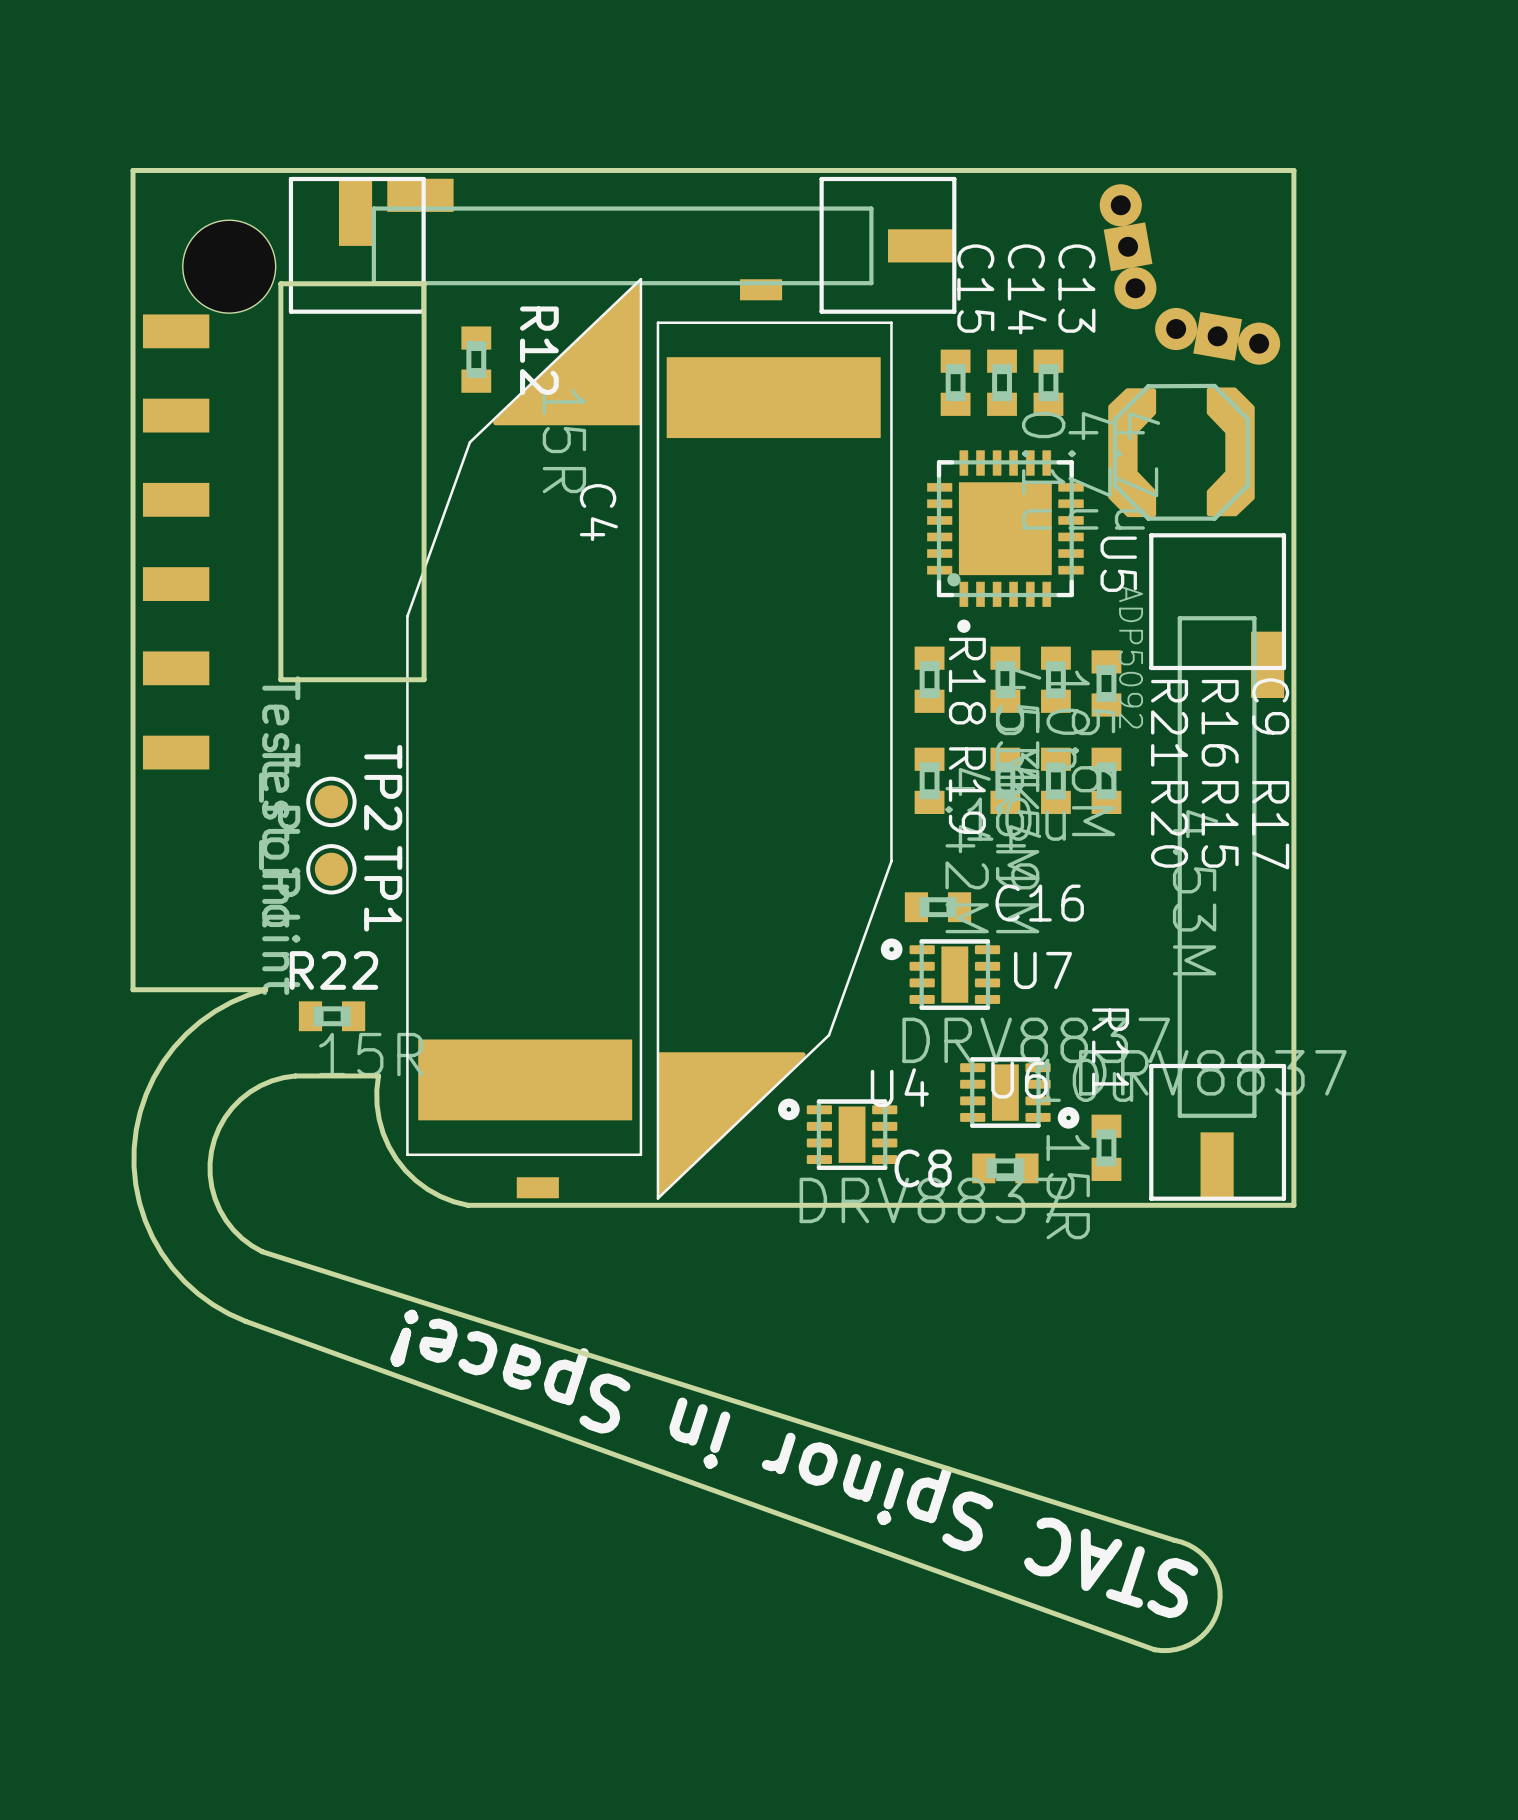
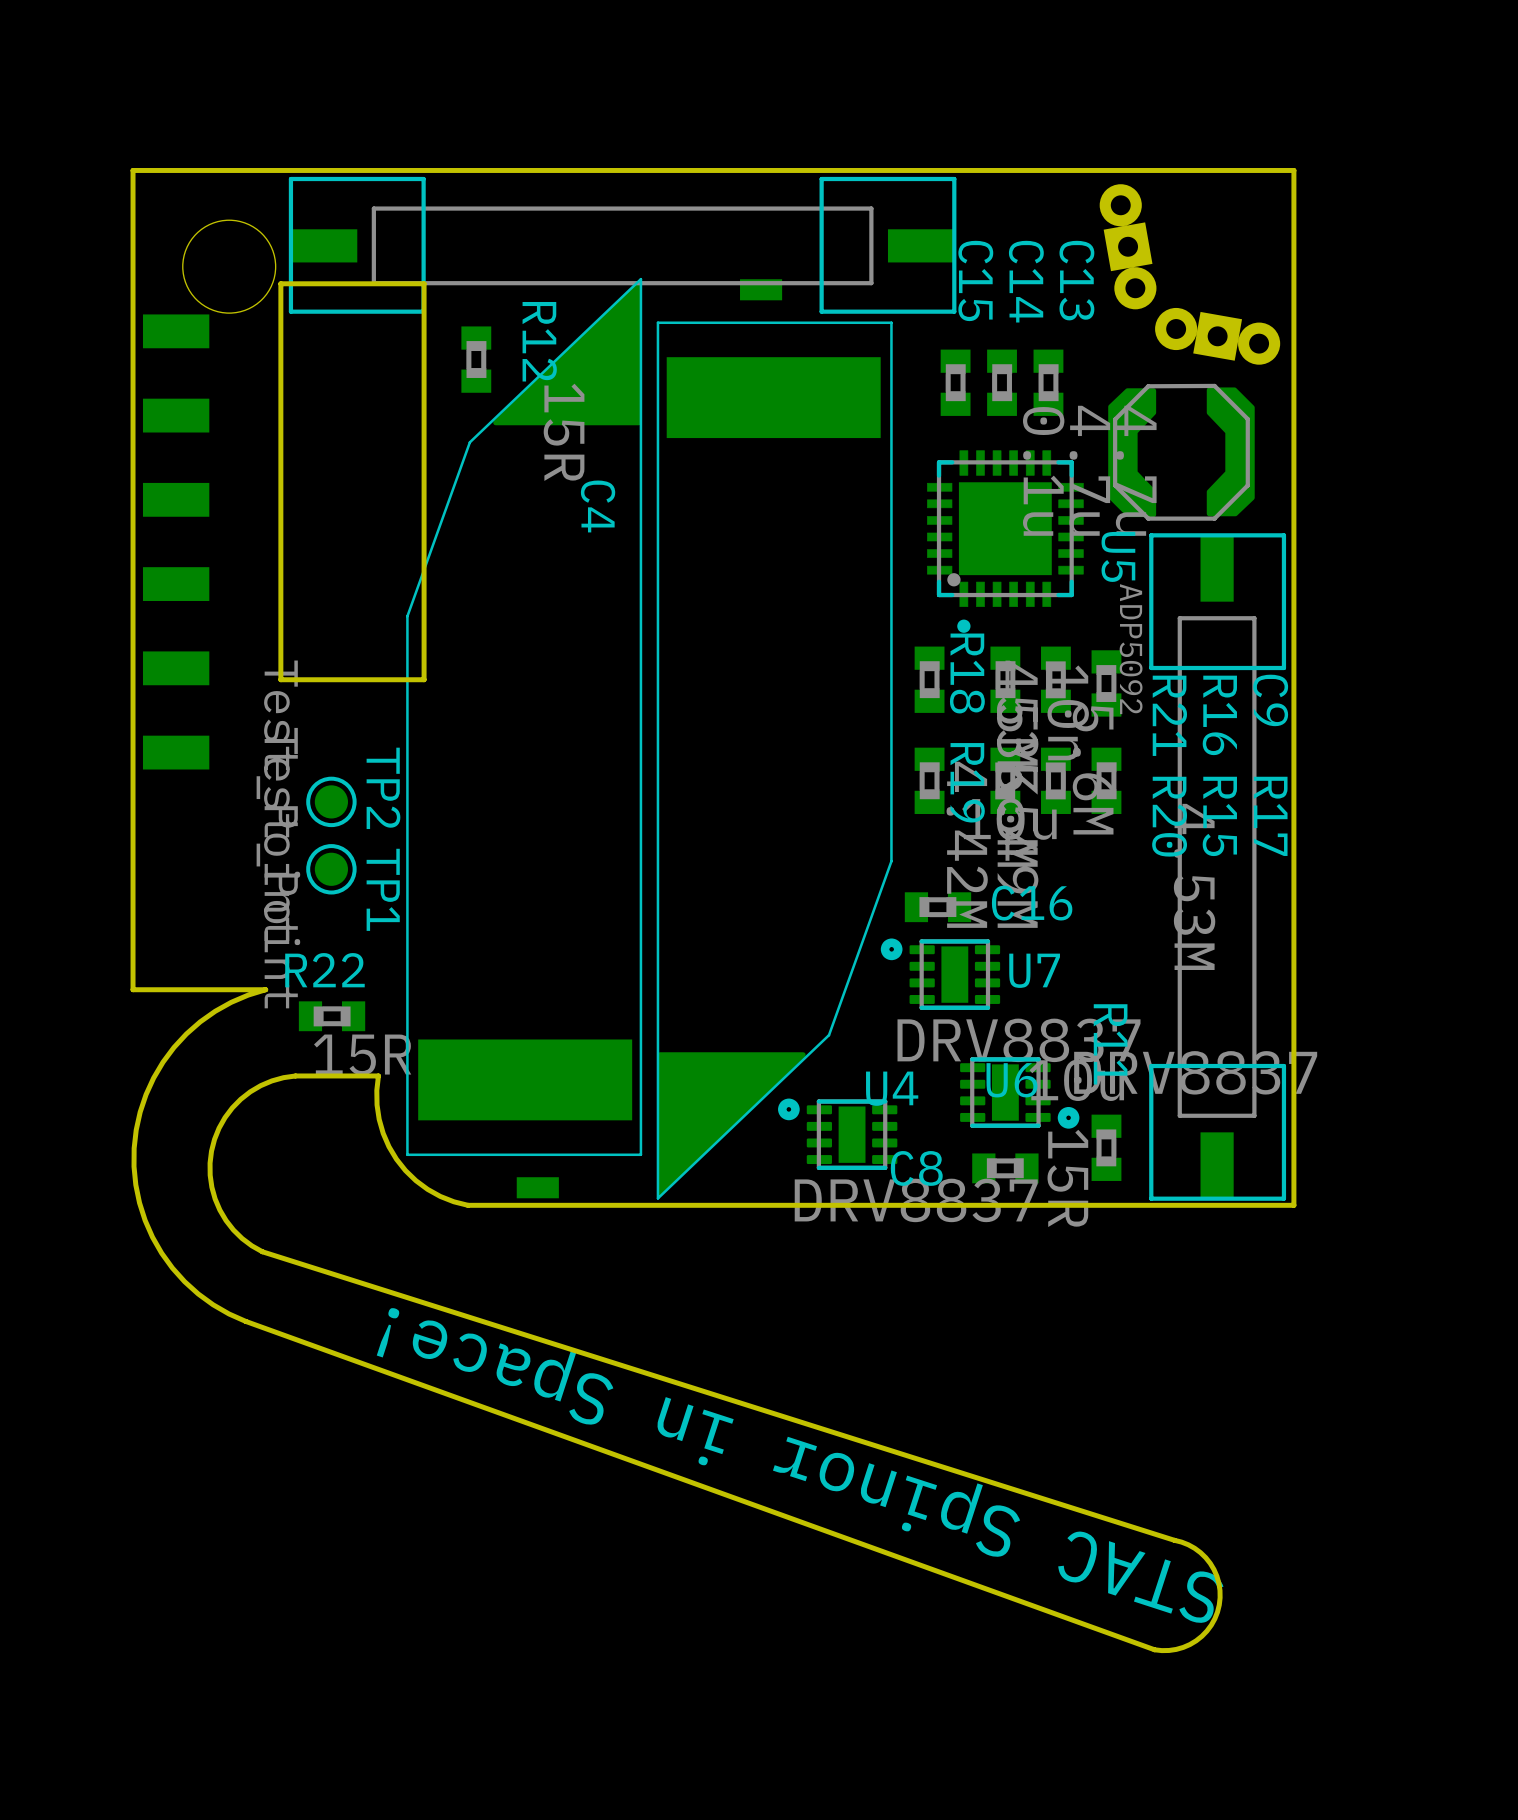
part footprint: [288, 176, 957, 314] -> [288, 176, 957, 314]
part: (355, 212) -> none
part footprint: [1149, 533, 1287, 1201] -> [1149, 533, 1287, 1201]

